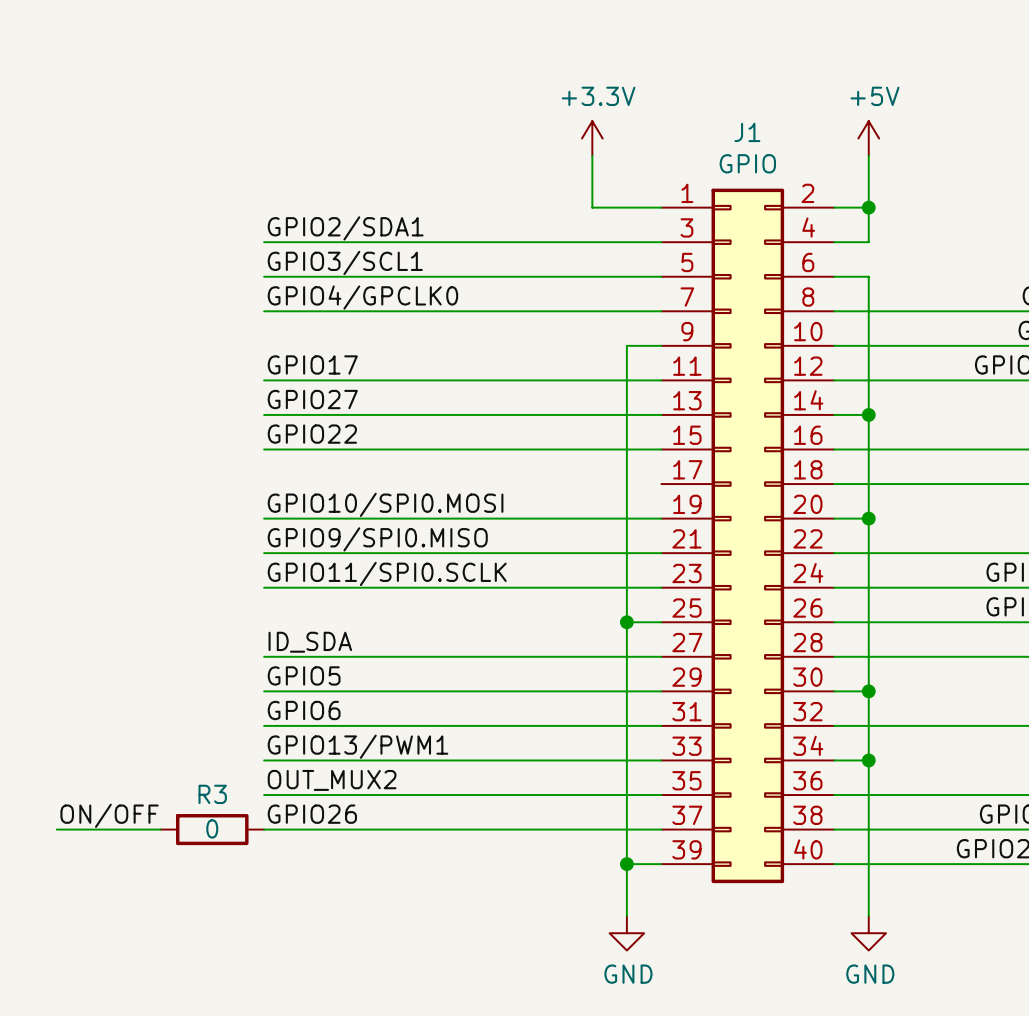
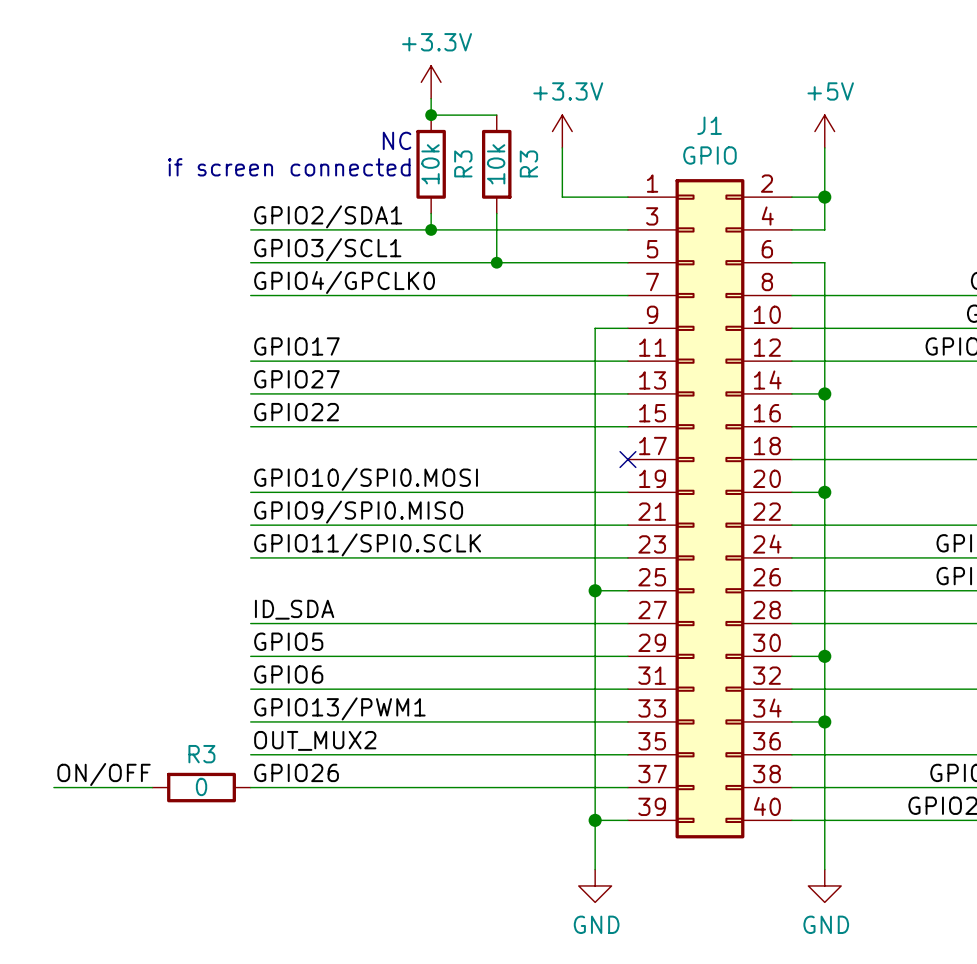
power symbol: none -> +3.3V (431, 82)
wire: none -> (431, 98) (431, 115) (496, 115)
junction: none -> (431, 115)
text: none -> NC (397, 140)
R3: none -> 10k (431, 164)
R3: none -> 10k (496, 164)
text: none -> if screen connected (289, 167)
wire: none -> (431, 213) (431, 229)
wire: none -> (496, 213) (496, 262)
junction: none -> (431, 229)
junction: none -> (496, 262)
no-connect mark: none -> (627, 459)

